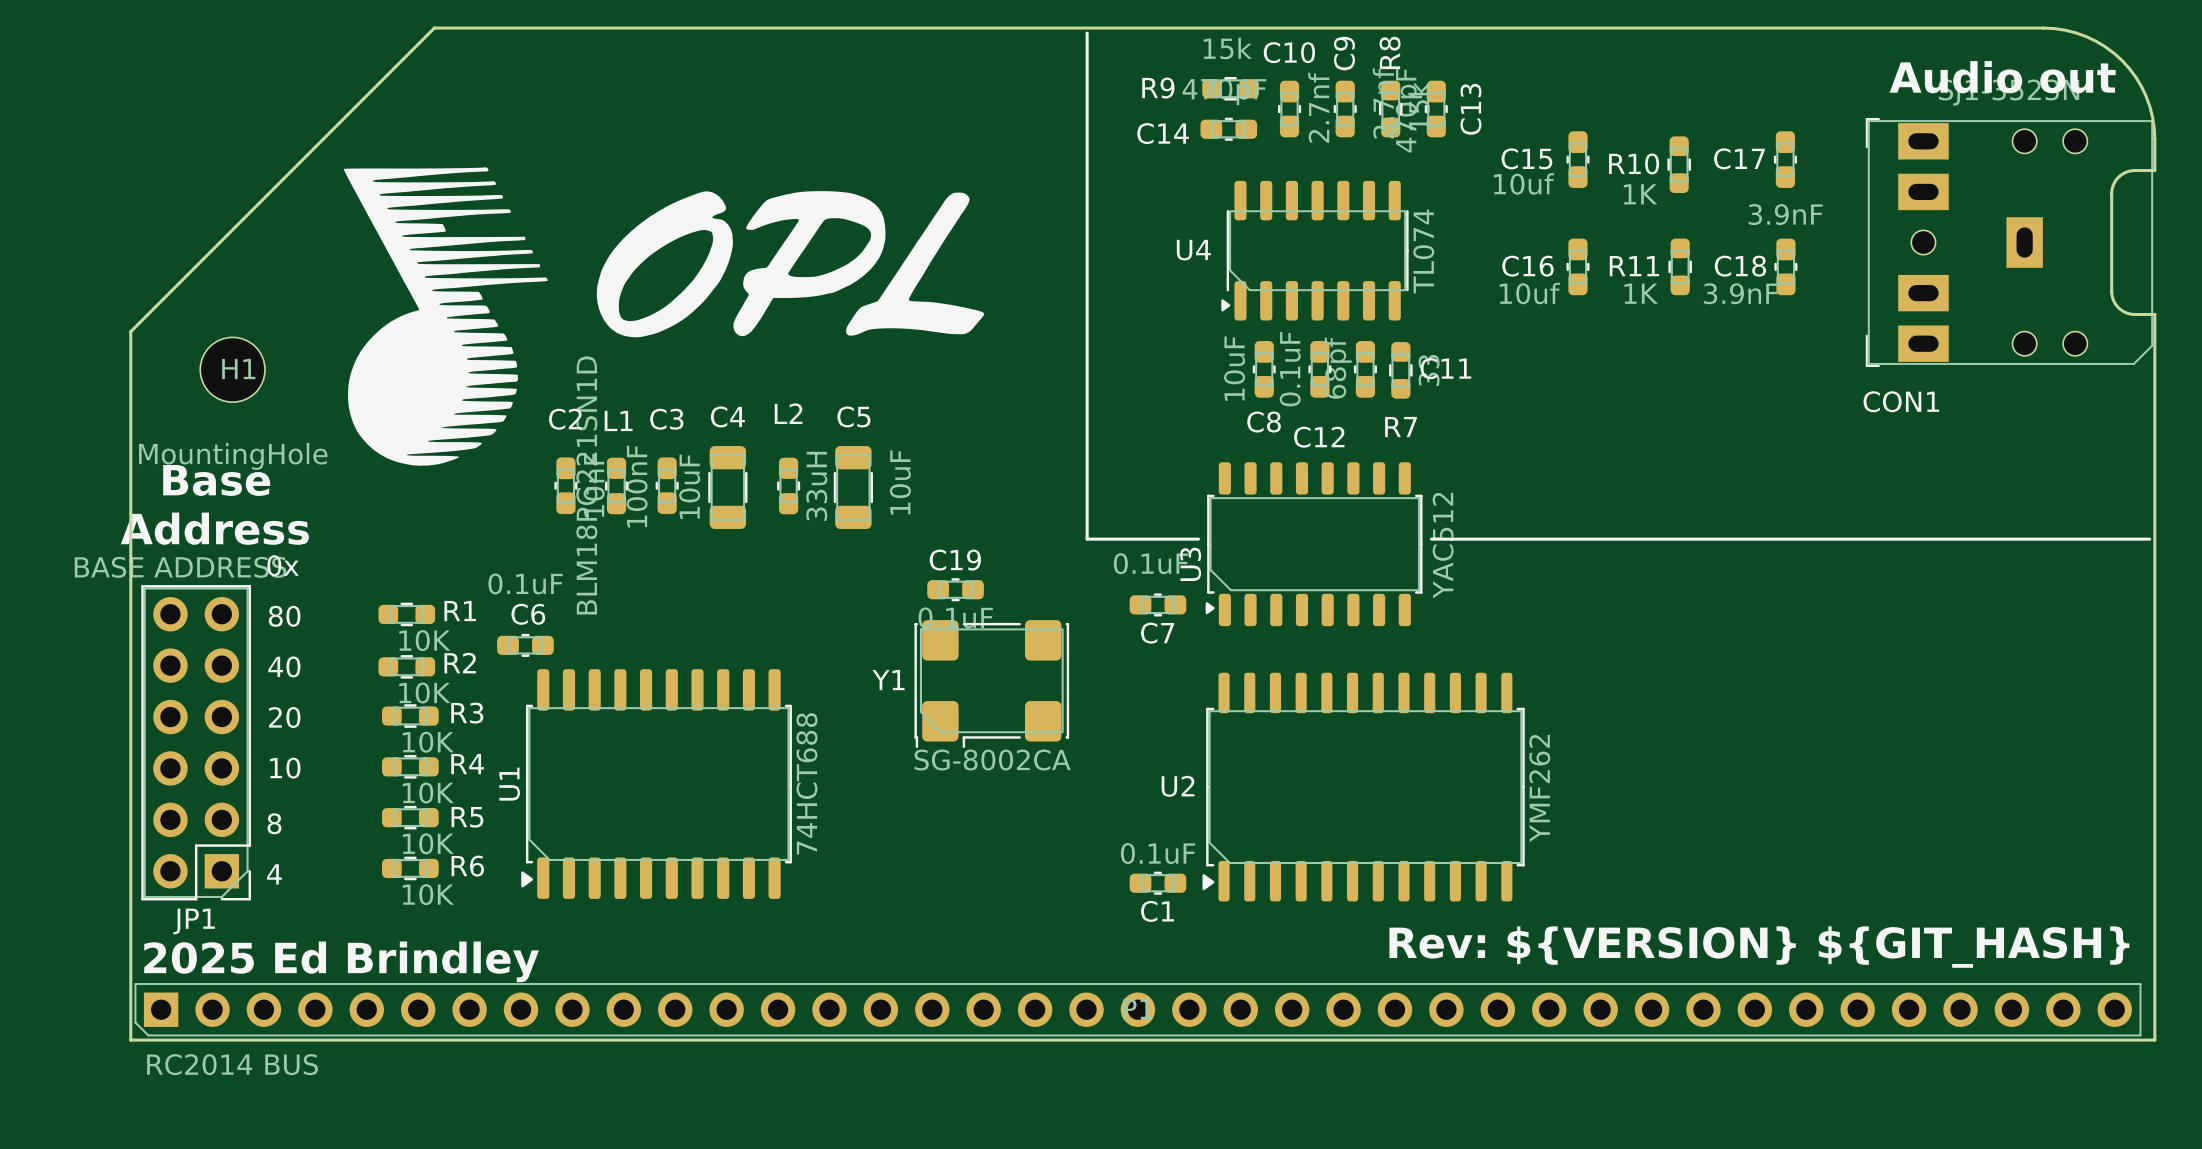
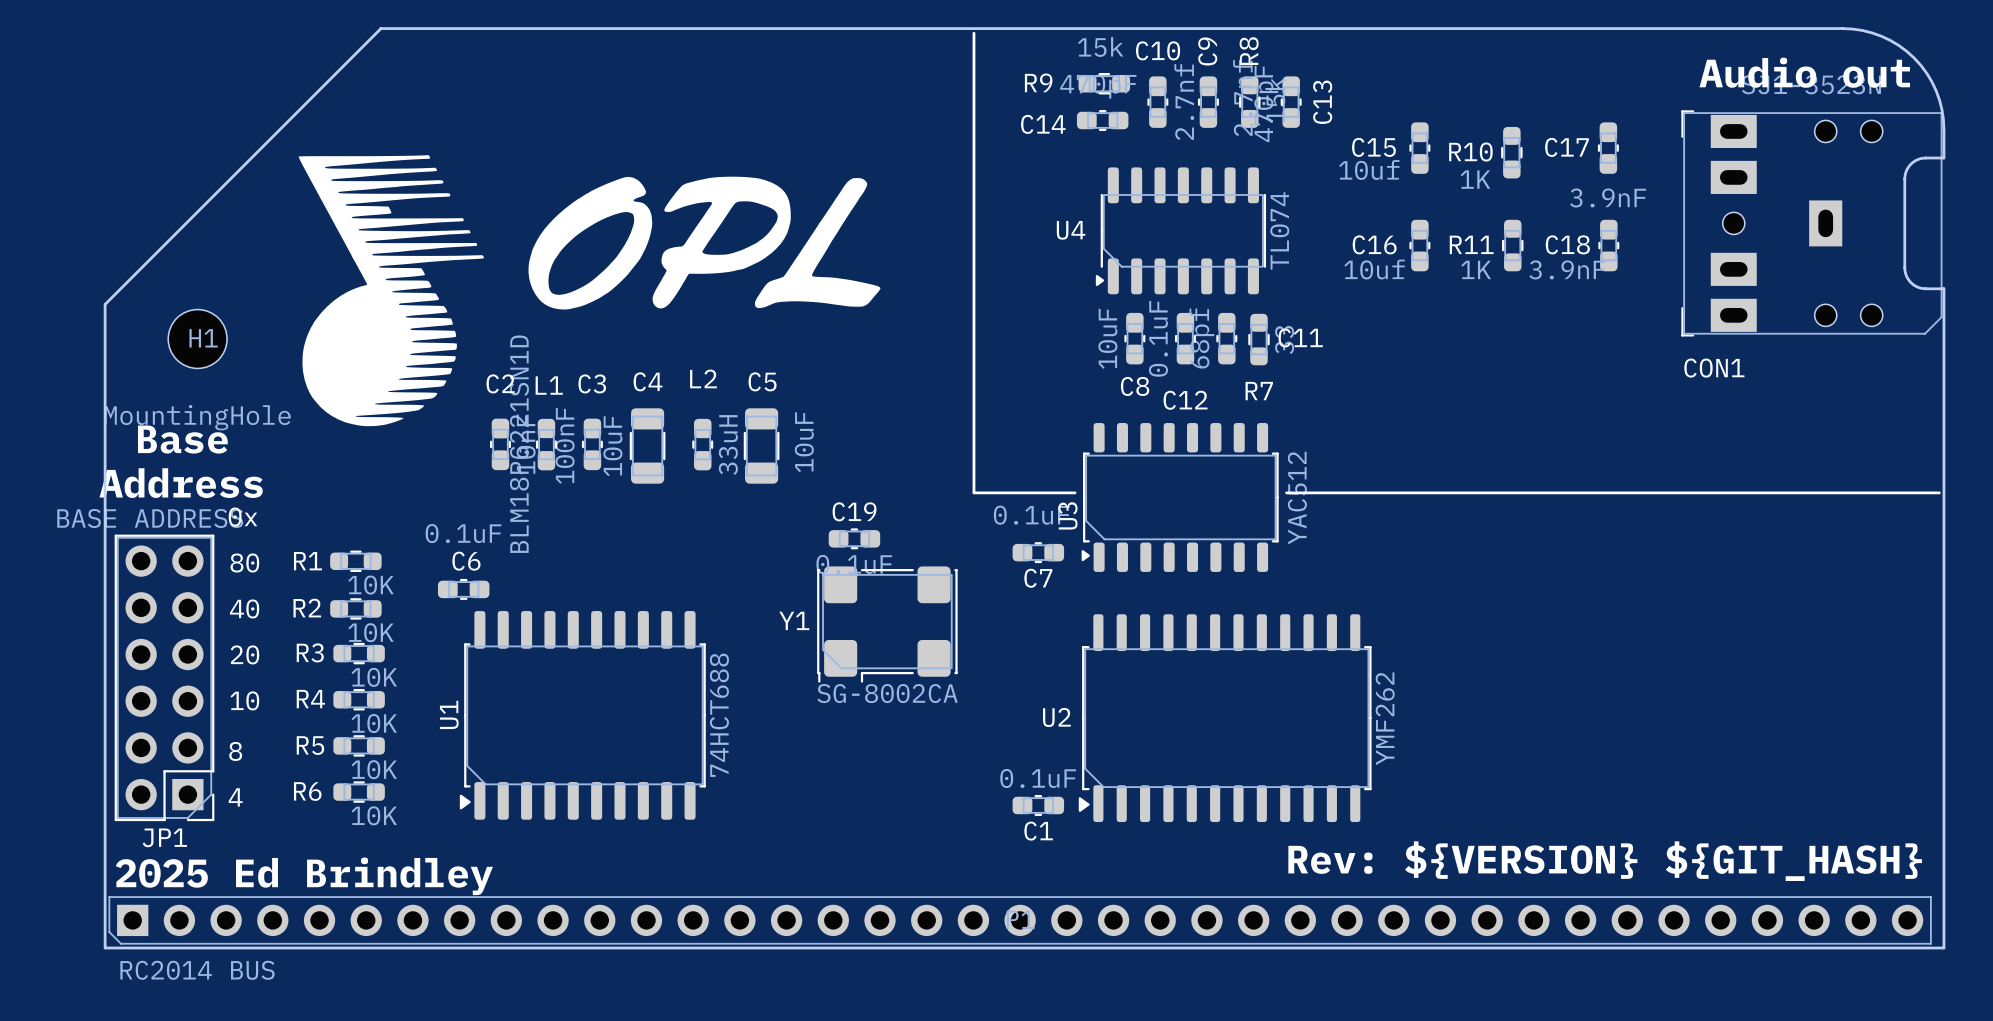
R1 name position: R1 (460, 611) -> R1 (307, 561)
R2 name position: R2 (460, 663) -> R2 (307, 608)
R3 name position: R3 (467, 713) -> R3 (310, 652)
R4 name position: R4 (467, 764) -> R4 (310, 699)
R5 name position: R5 (467, 817) -> R5 (310, 745)
R6 name position: R6 (467, 866) -> R6 (307, 791)

